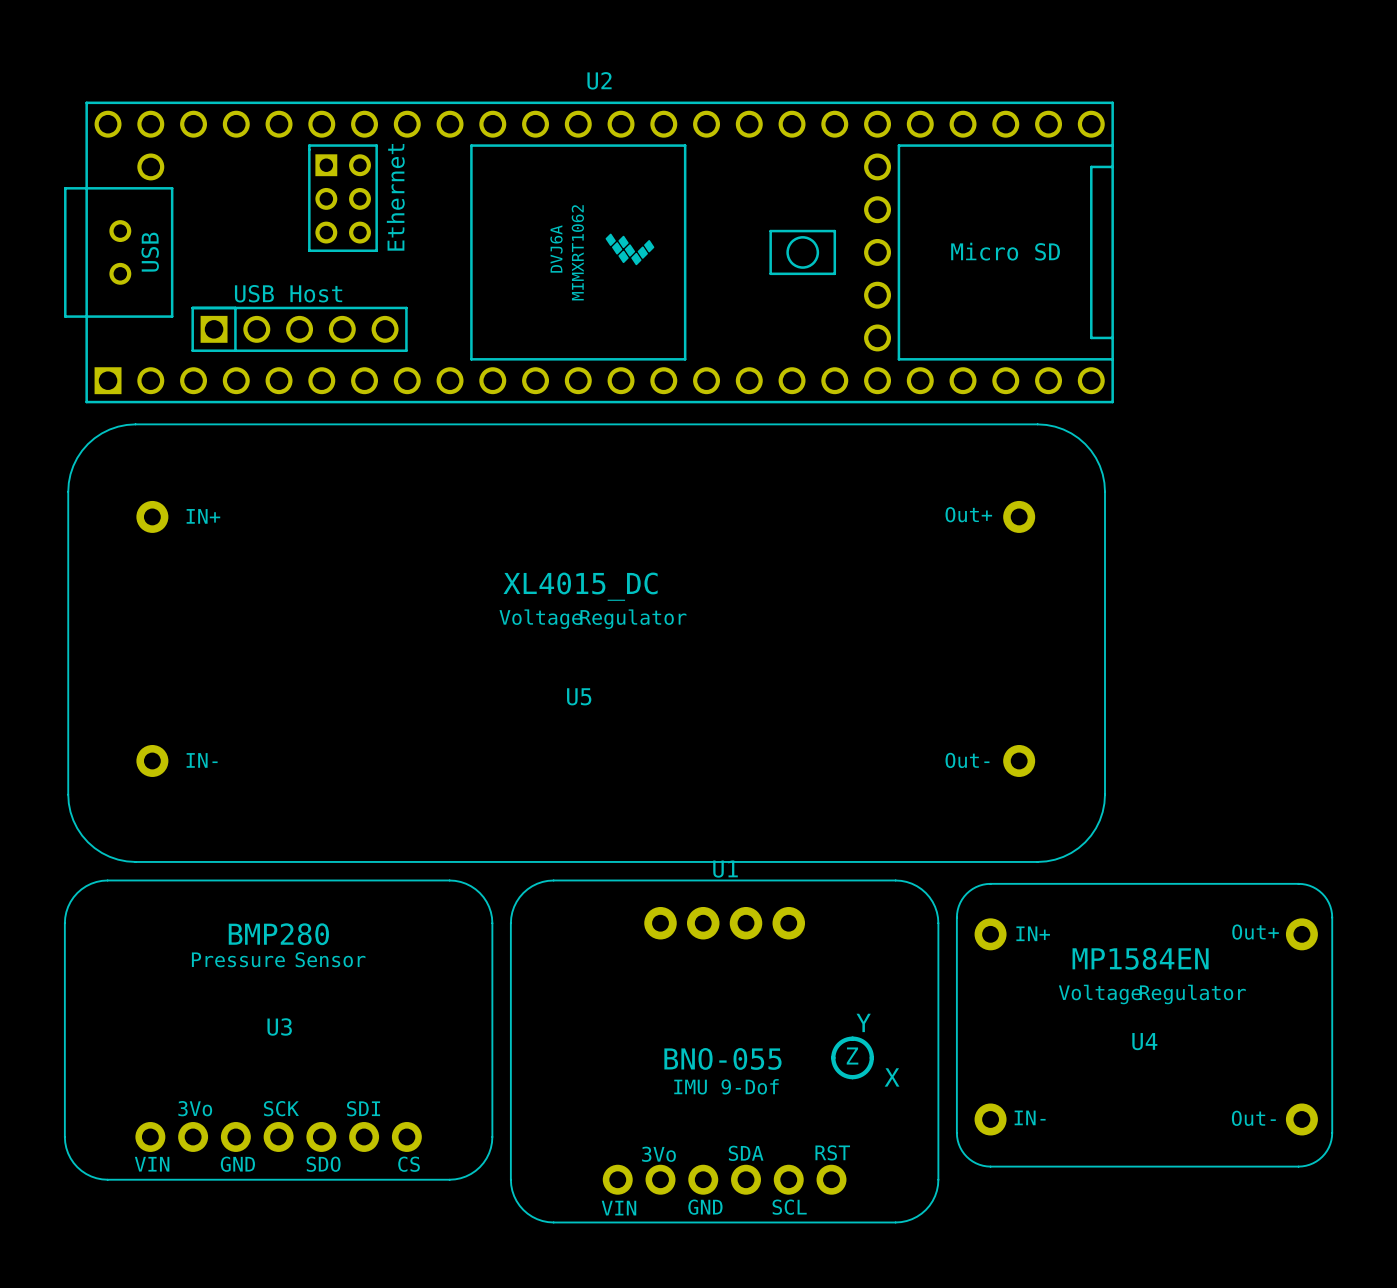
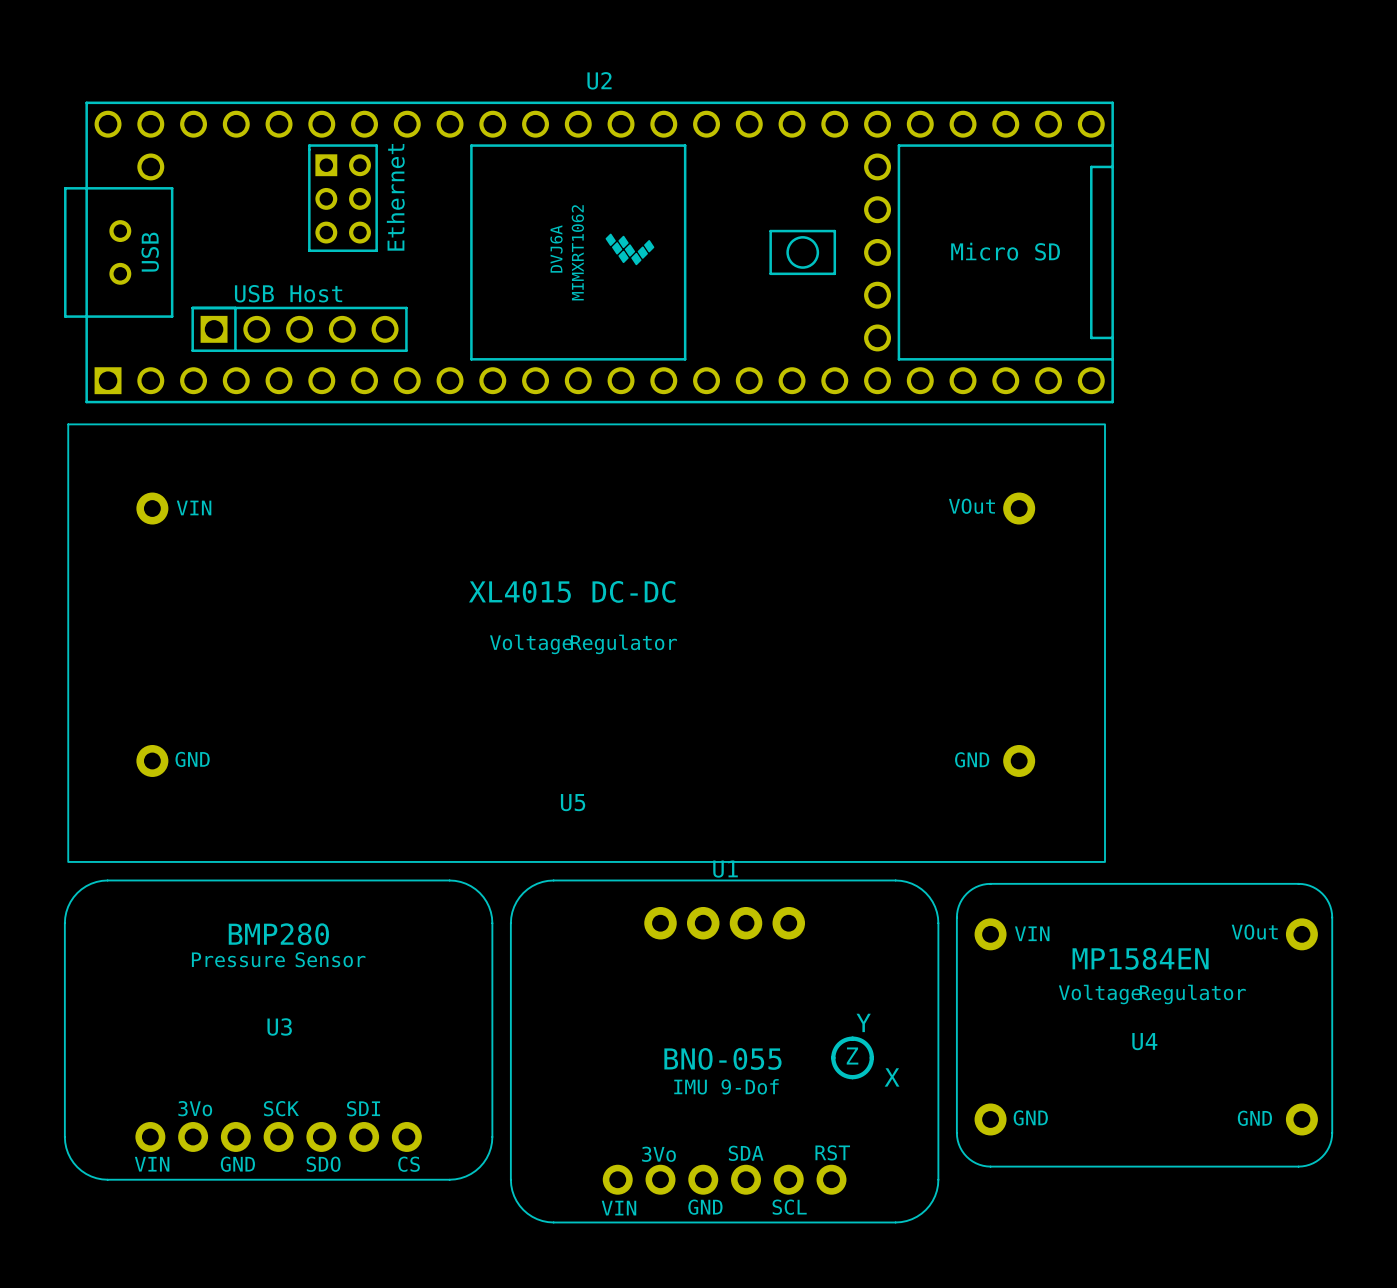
U5 footprint: [67, 423, 1106, 863] -> [67, 423, 1106, 863]
U5 name position: U5 (579, 696) -> U5 (573, 802)
U4 text: Out+ (1255, 932) -> VOut (1254, 932)
U4 text: IN+ (1033, 933) -> VIN (1032, 933)
U4 text: IN- (1030, 1117) -> GND (1030, 1117)
U4 text: Out- (1253, 1118) -> GND (1254, 1118)

